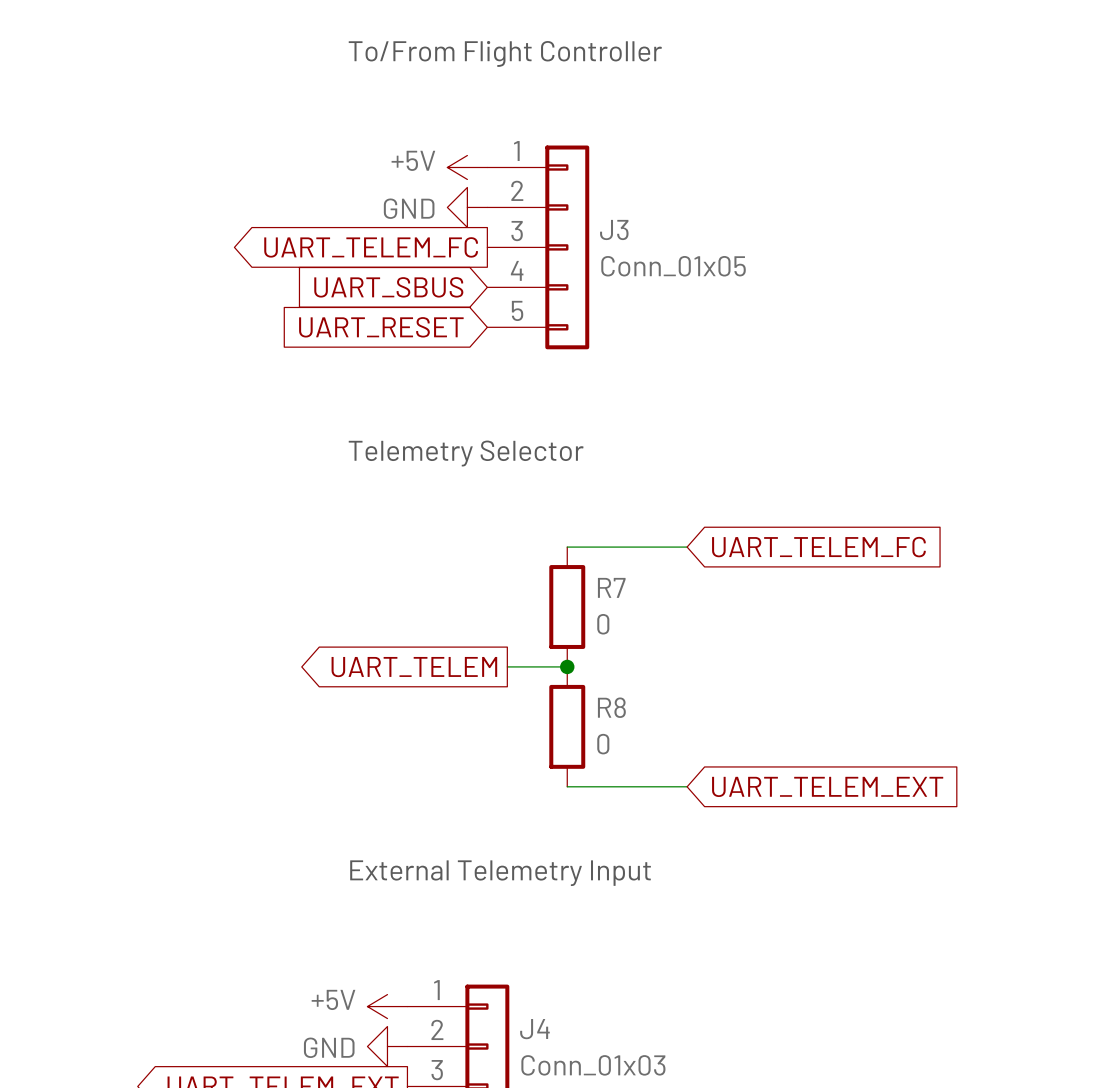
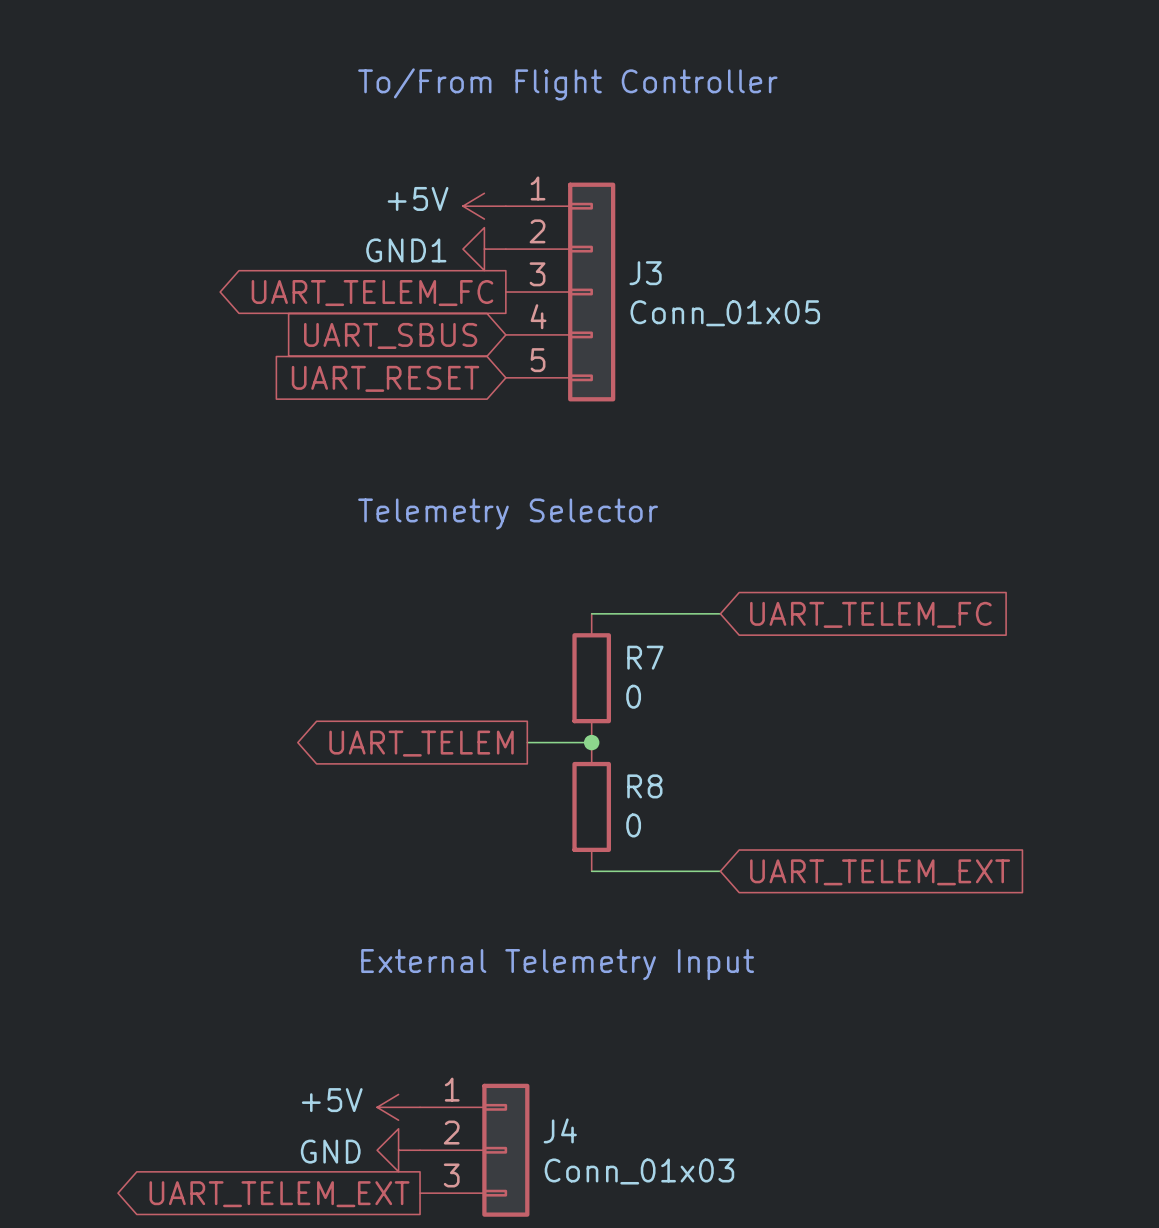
power symbol: GND (467, 207) -> GND1 (484, 249)

